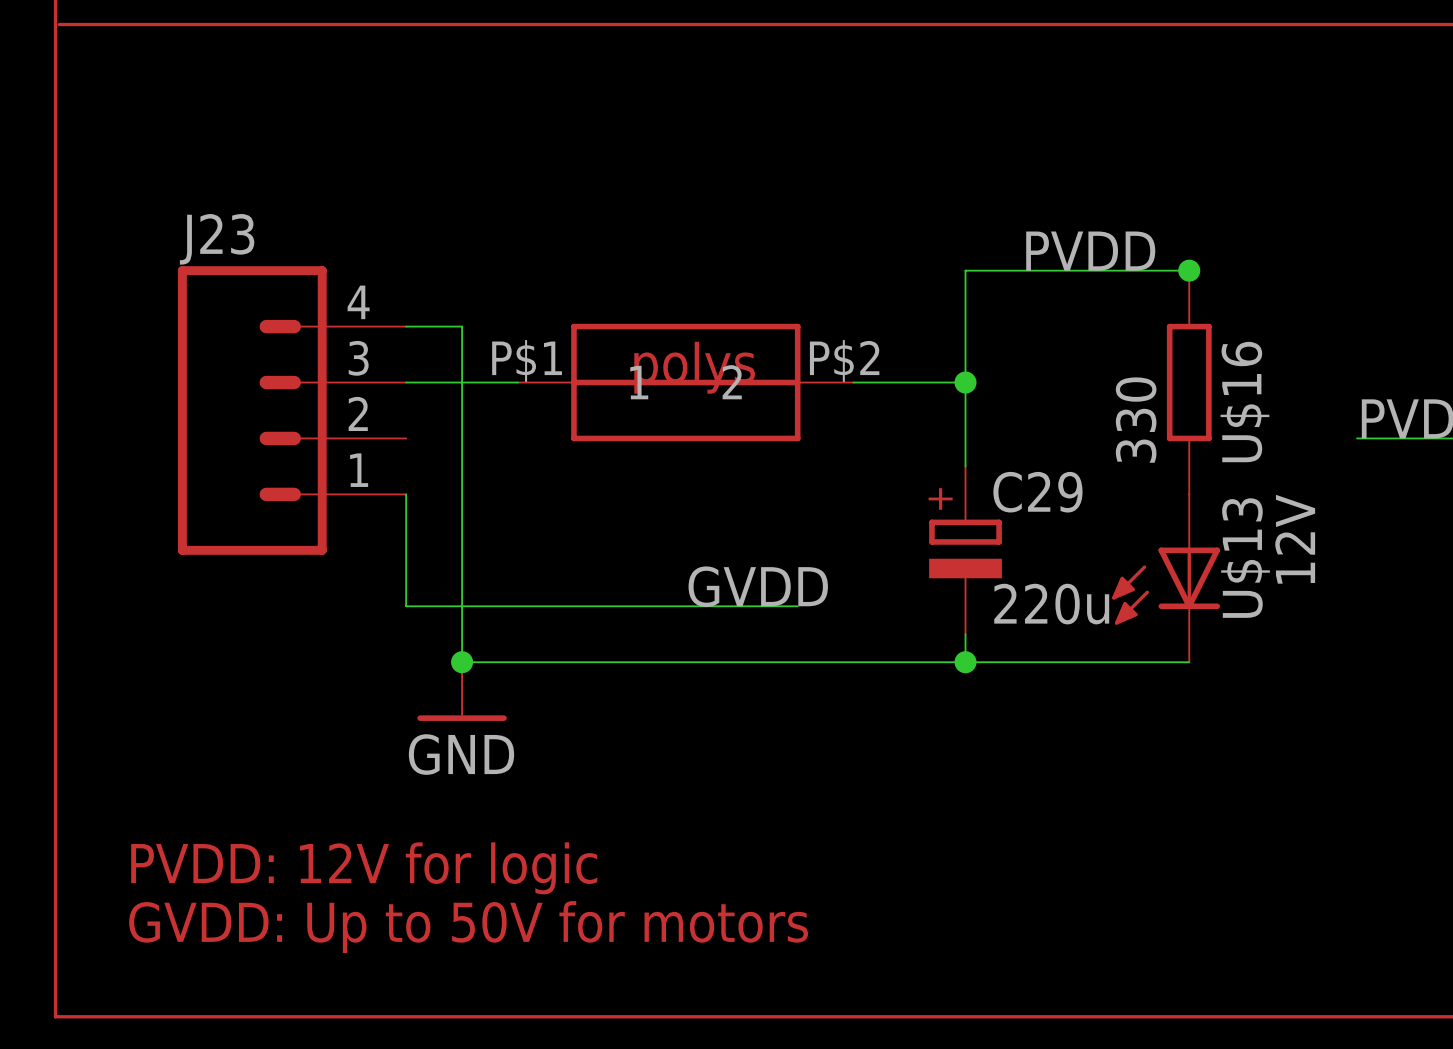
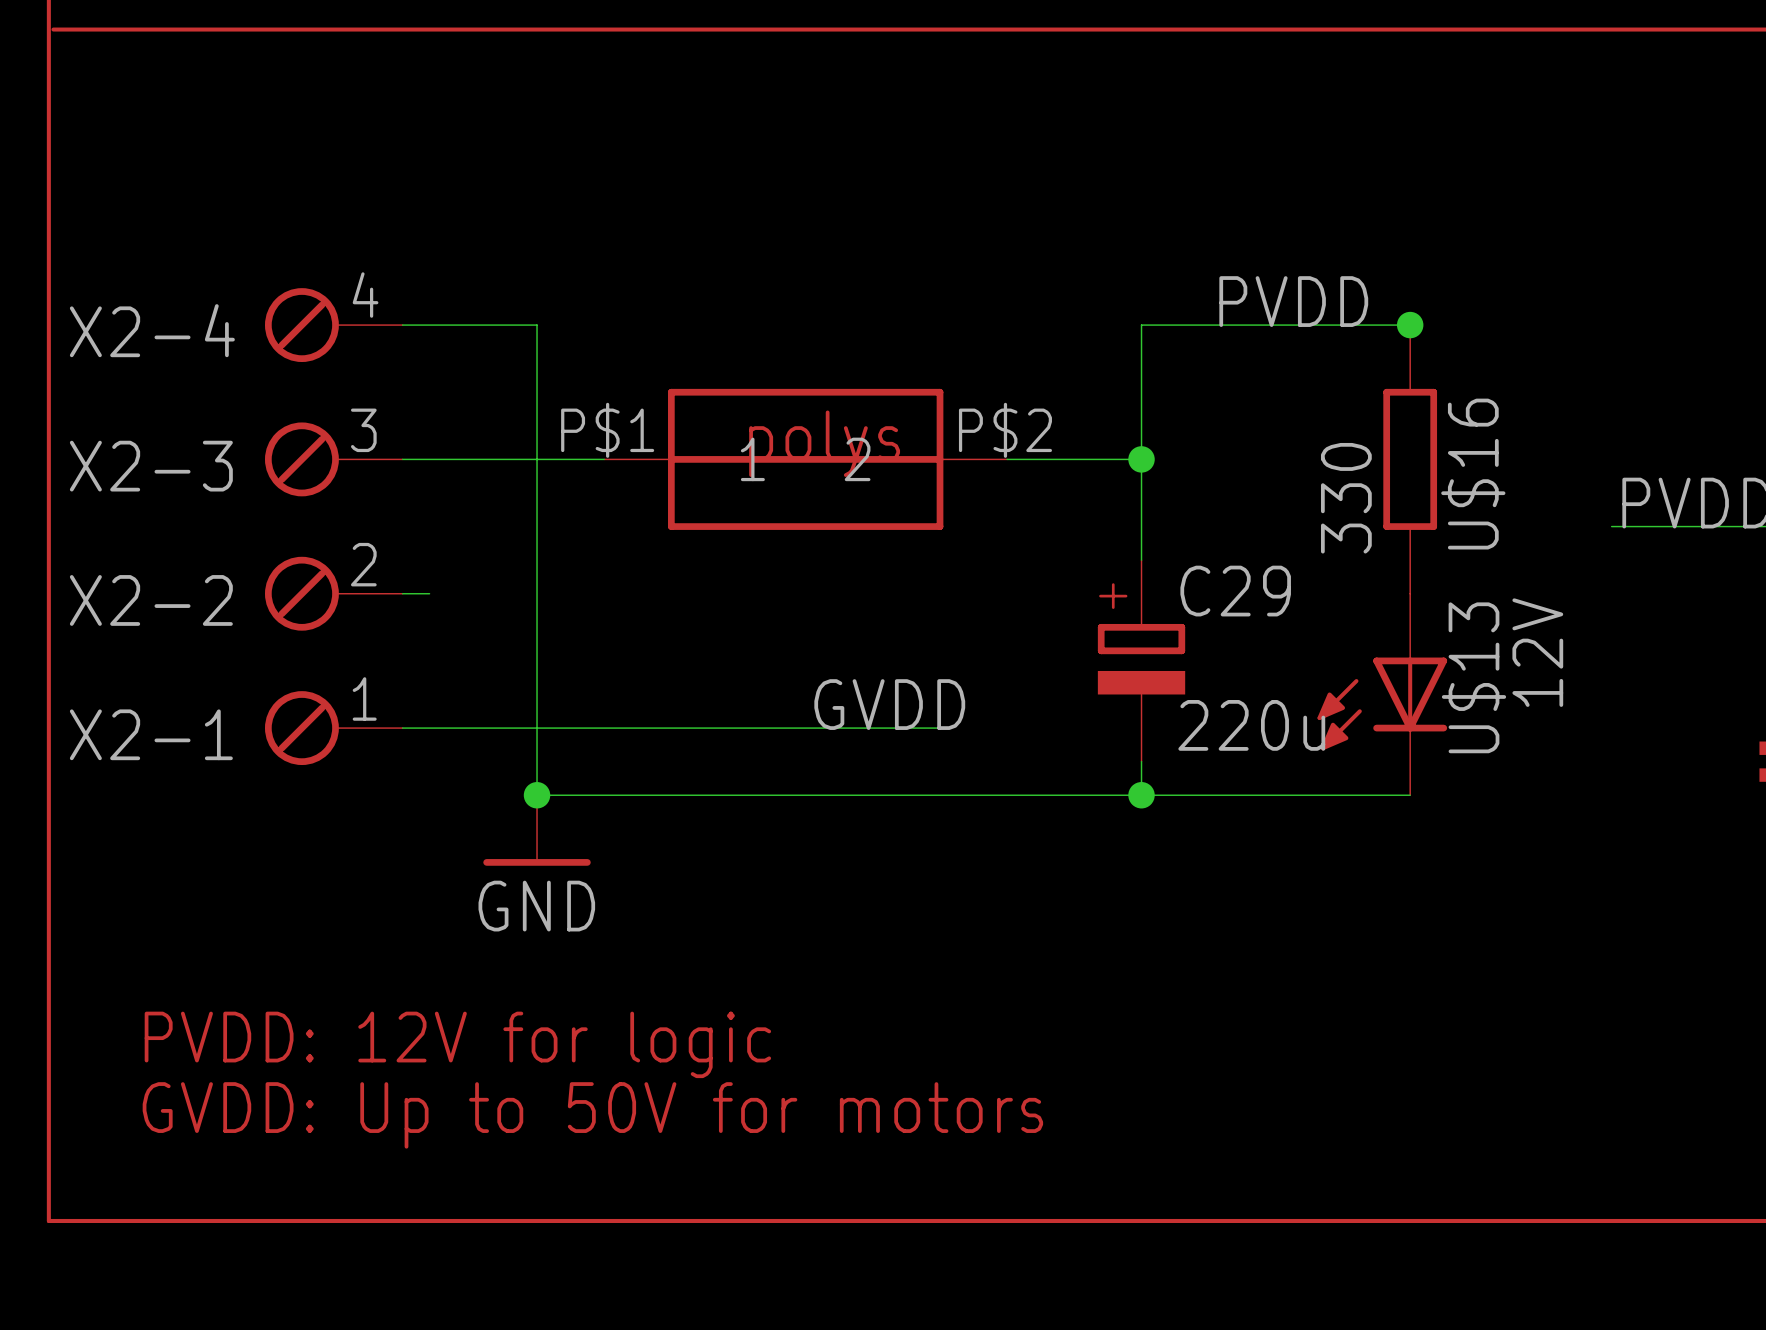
X2-4: none -> (333, 325)
wire: (406, 326) (462, 326) -> (402, 325) (537, 325) (537, 392)
X2-3: none -> (333, 459)
J23: (292, 410) -> none
X2-2: none -> (333, 593)
wire: (406, 494) (406, 606) -> (402, 728) (469, 728)
X2-1: none -> (333, 728)

